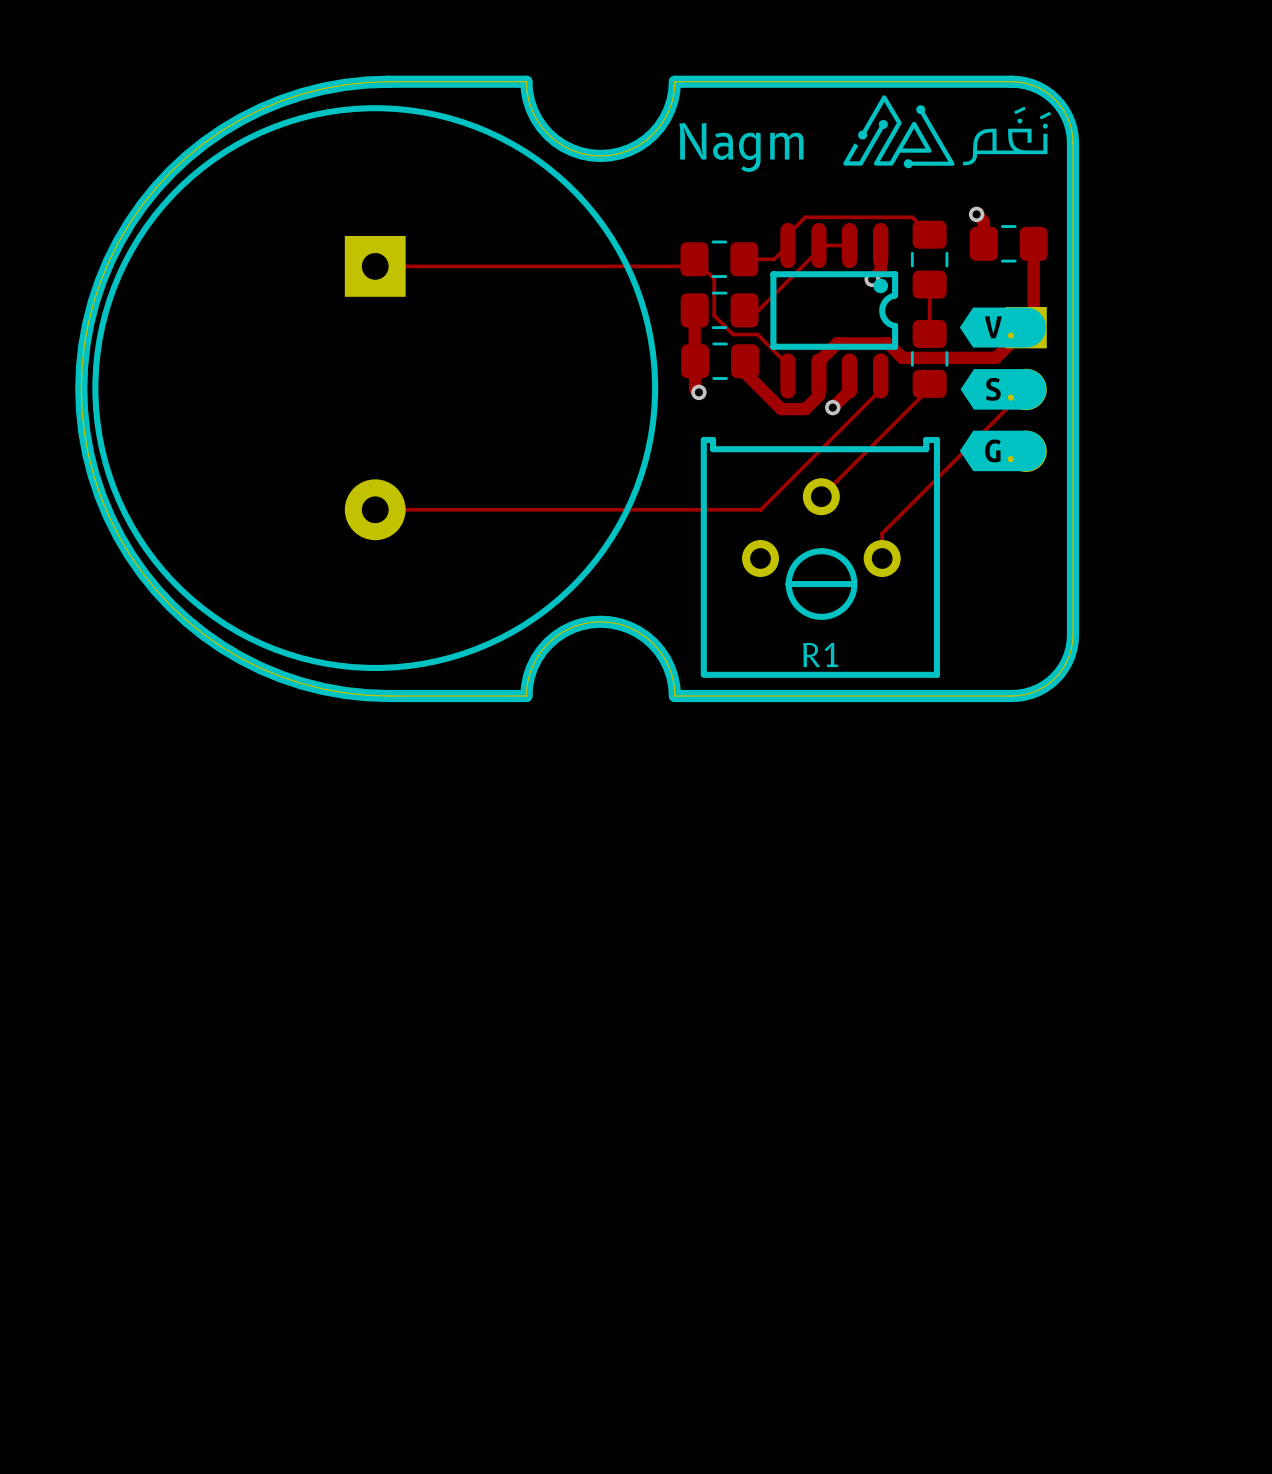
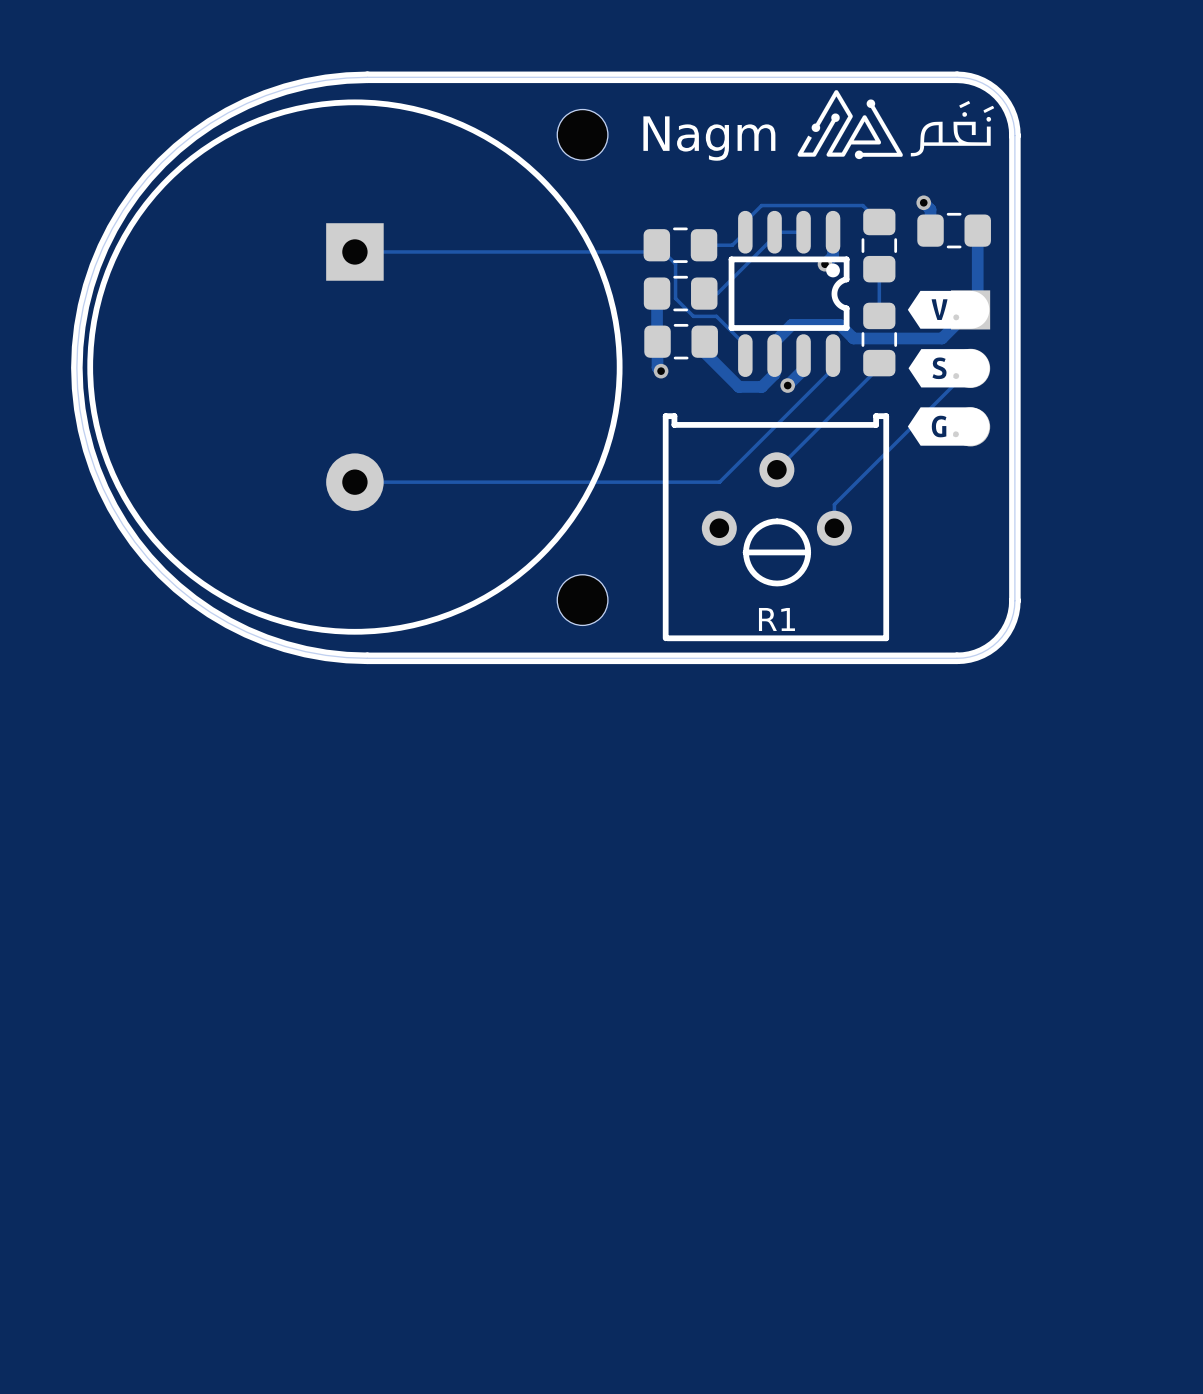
line: (526, 81) (532, 110) (548, 134) (572, 150) (600, 155) (629, 150) (653, 134) (669, 110) (674, 81) -> (497, 77) (638, 77)
board edge: (526, 81) (532, 110) (548, 134) (572, 150) (600, 155) (629, 150) (653, 134) (669, 110) (674, 81) -> (497, 77) (638, 77)
part: none -> (582, 134)
part: none -> (582, 600)
line: (526, 696) (532, 667) (548, 643) (572, 627) (600, 621) (629, 627) (653, 643) (669, 667) (674, 696) -> (497, 658) (638, 658)
board edge: (526, 696) (532, 667) (548, 643) (572, 627) (600, 621) (629, 627) (653, 643) (669, 667) (674, 696) -> (497, 658) (638, 658)

